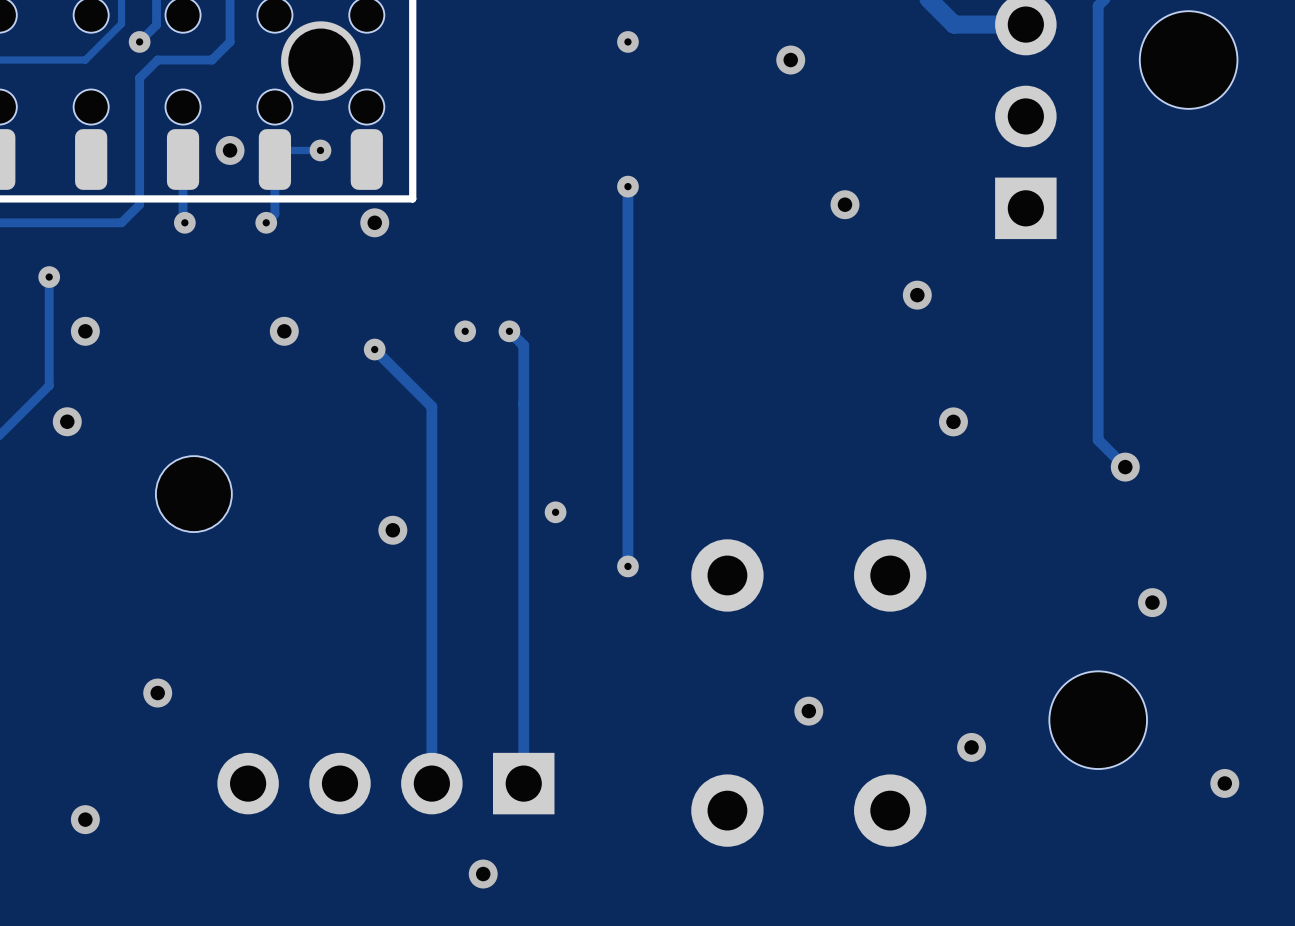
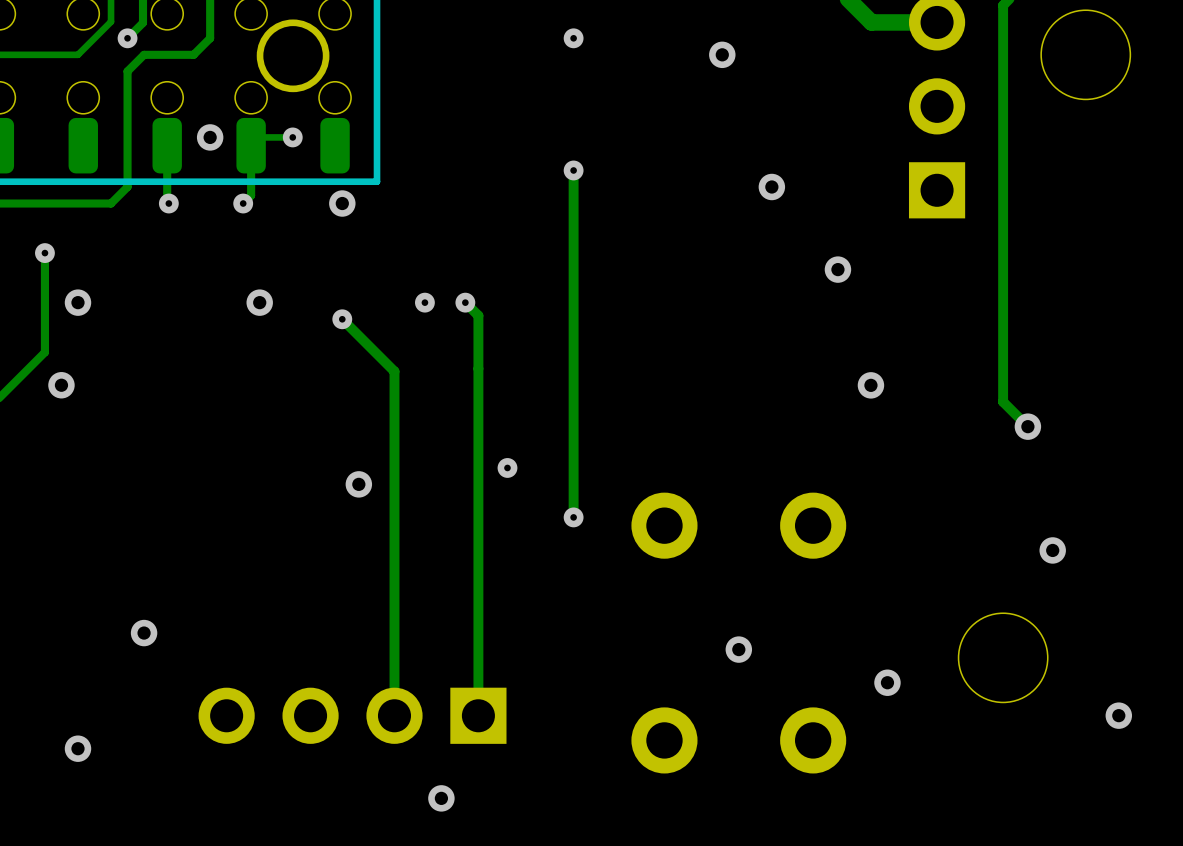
part: (193, 494) -> none

